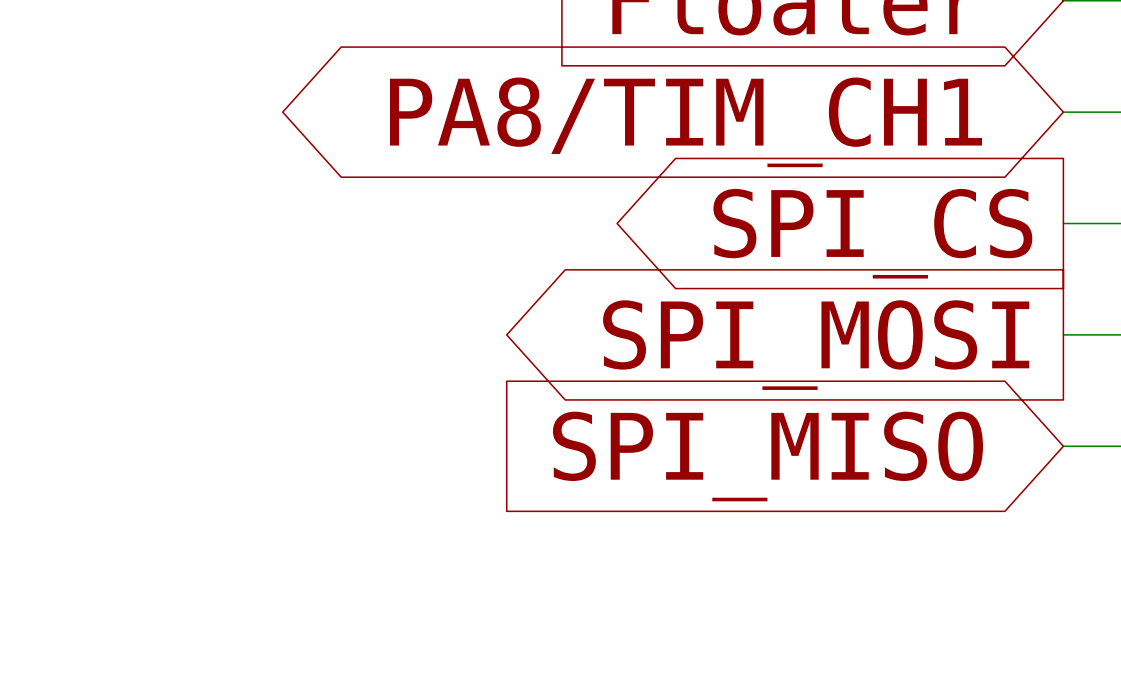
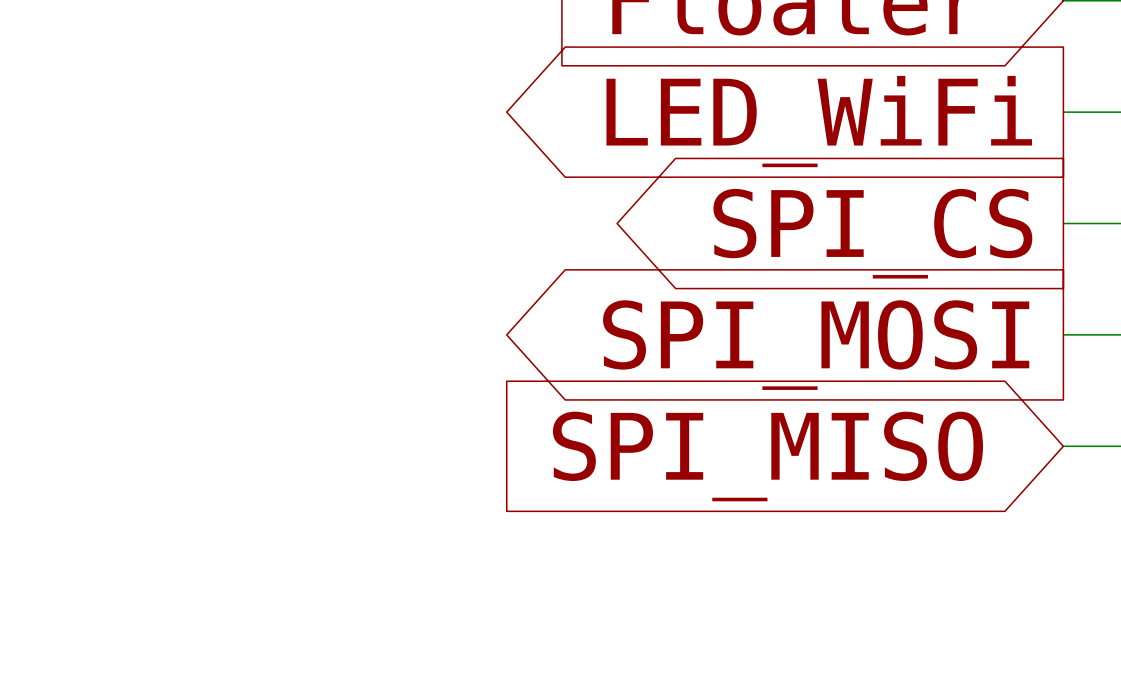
global label shape: bidirectional (685, 122) -> output (819, 121)
global label: PA8/TIM_CH1 (685, 122) -> LED_WiFi (819, 121)

